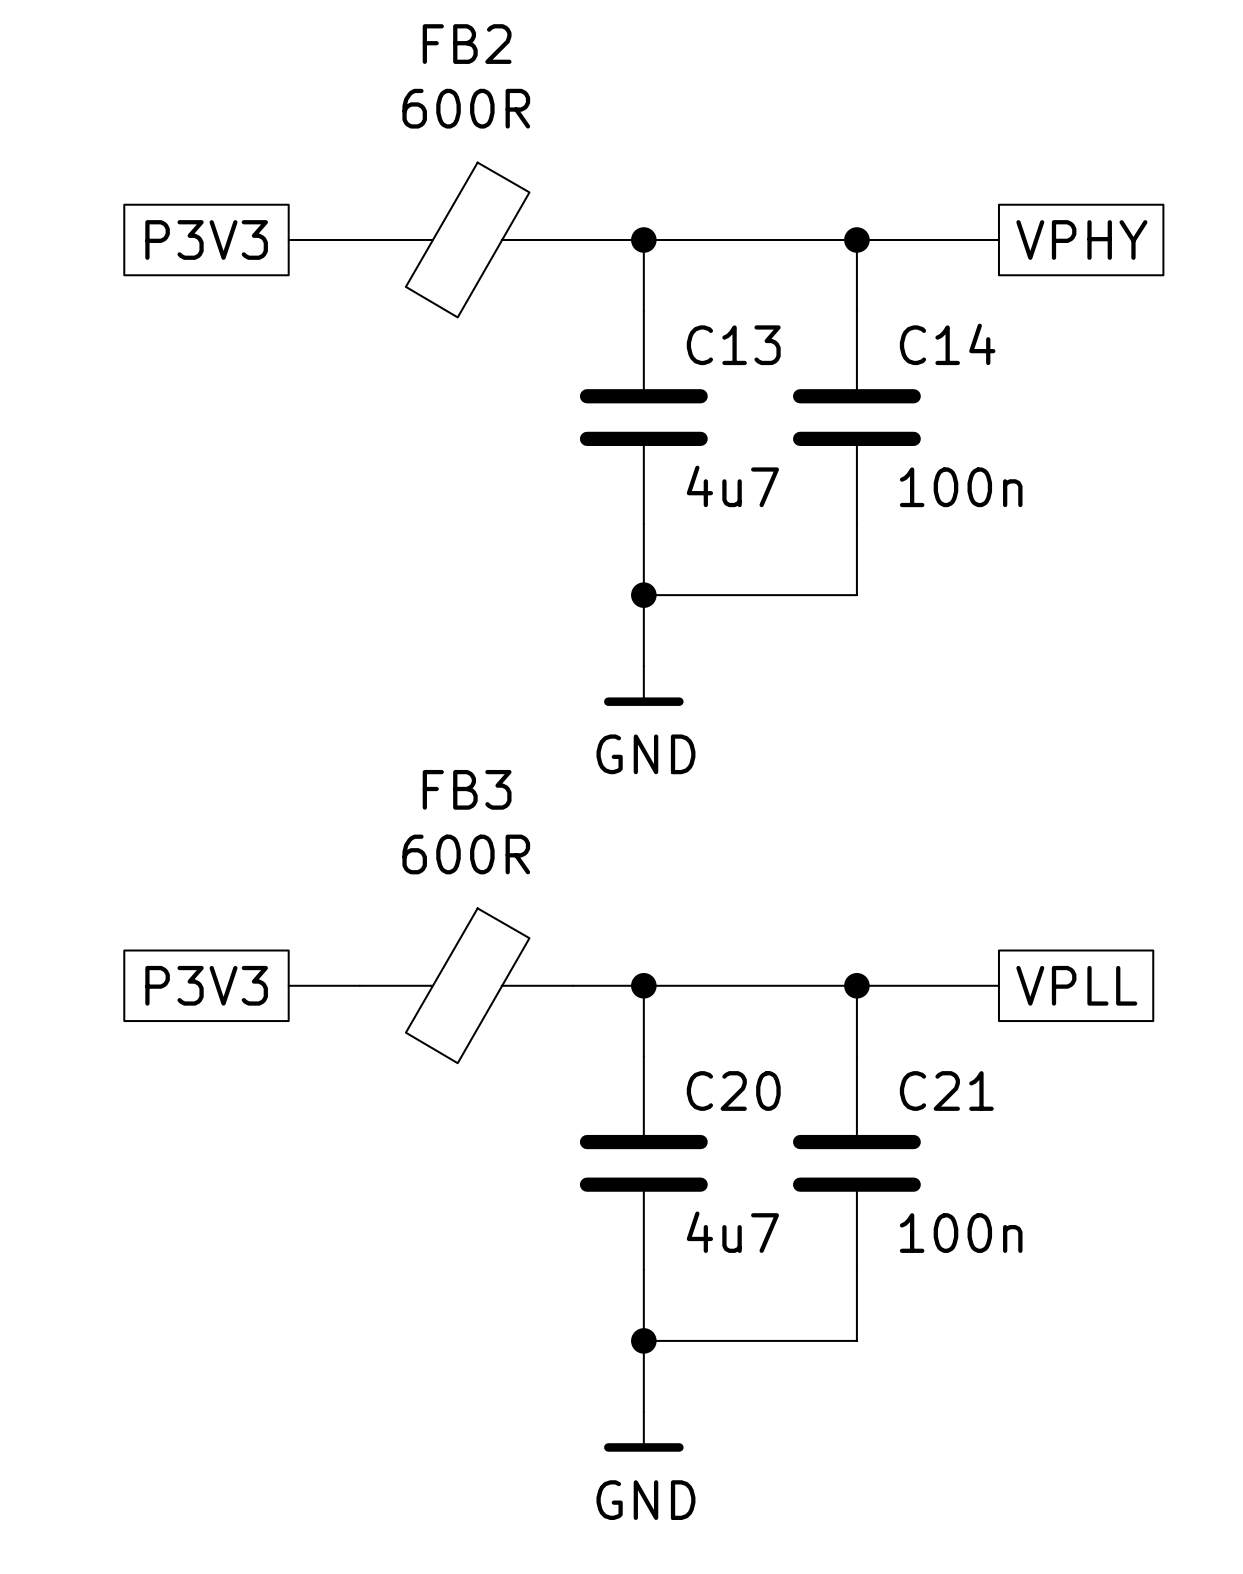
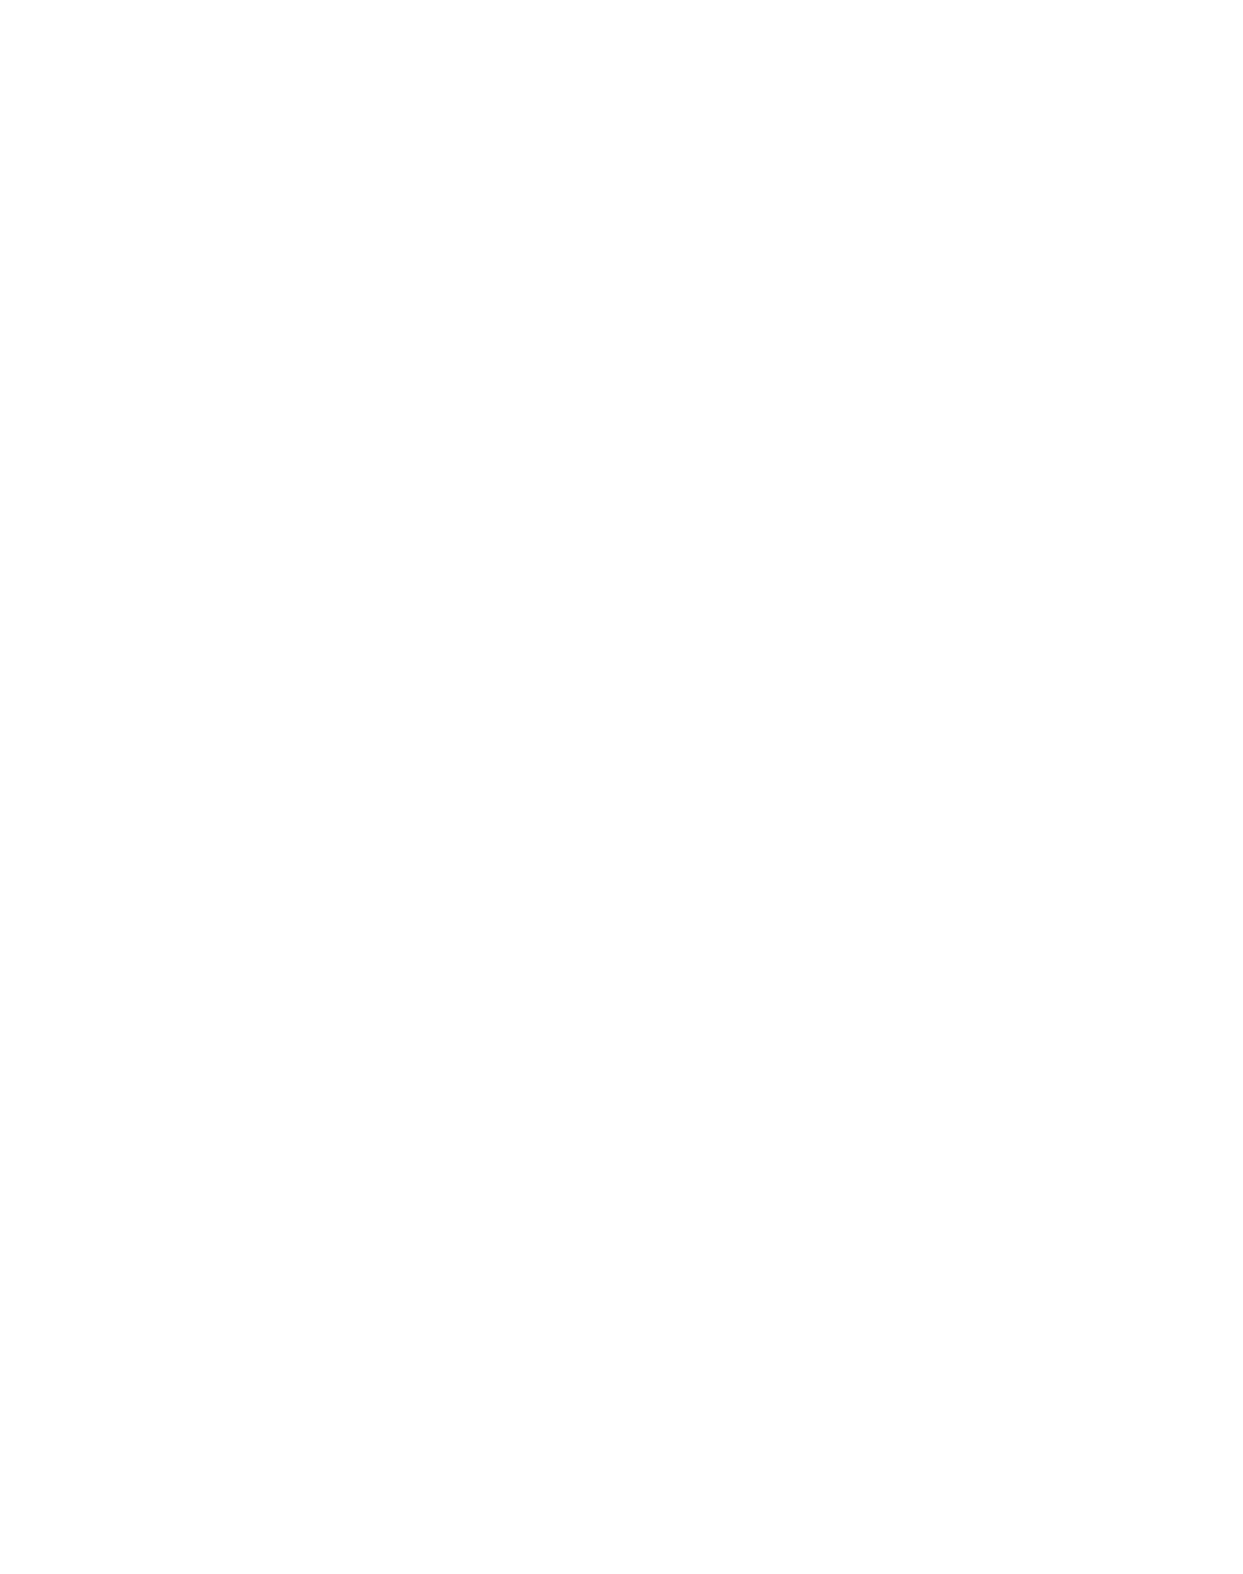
global label: P3V3 (206, 240) -> none
wire: (288, 240) (359, 240) -> none
FB2: 600R (466, 240) -> none
wire: (572, 240) (998, 240) -> none
wire: (643, 240) (643, 311) -> none
junction: (643, 240) -> none
wire: (856, 240) (856, 311) -> none
junction: (856, 240) -> none
global label: VPHY (1081, 240) -> none
C13: 4u7 (643, 417) -> none
C14: 100n (856, 417) -> none
wire: (643, 524) (643, 666) -> none
wire: (856, 524) (856, 595) (643, 595) -> none
junction: (643, 595) -> none
power symbol: GND (643, 686) -> none
global label: P3V3 (206, 985) -> none
wire: (288, 985) (359, 985) -> none
FB3: 600R (466, 985) -> none
wire: (572, 985) (998, 985) -> none
wire: (643, 985) (643, 1056) -> none
junction: (643, 985) -> none
wire: (856, 985) (856, 1056) -> none
junction: (856, 985) -> none
global label: VPLL (1076, 985) -> none
C20: 4u7 (643, 1163) -> none
C21: 100n (856, 1163) -> none
wire: (643, 1269) (643, 1411) -> none
wire: (856, 1269) (856, 1340) (643, 1340) -> none
junction: (643, 1340) -> none
power symbol: GND (643, 1431) -> none

